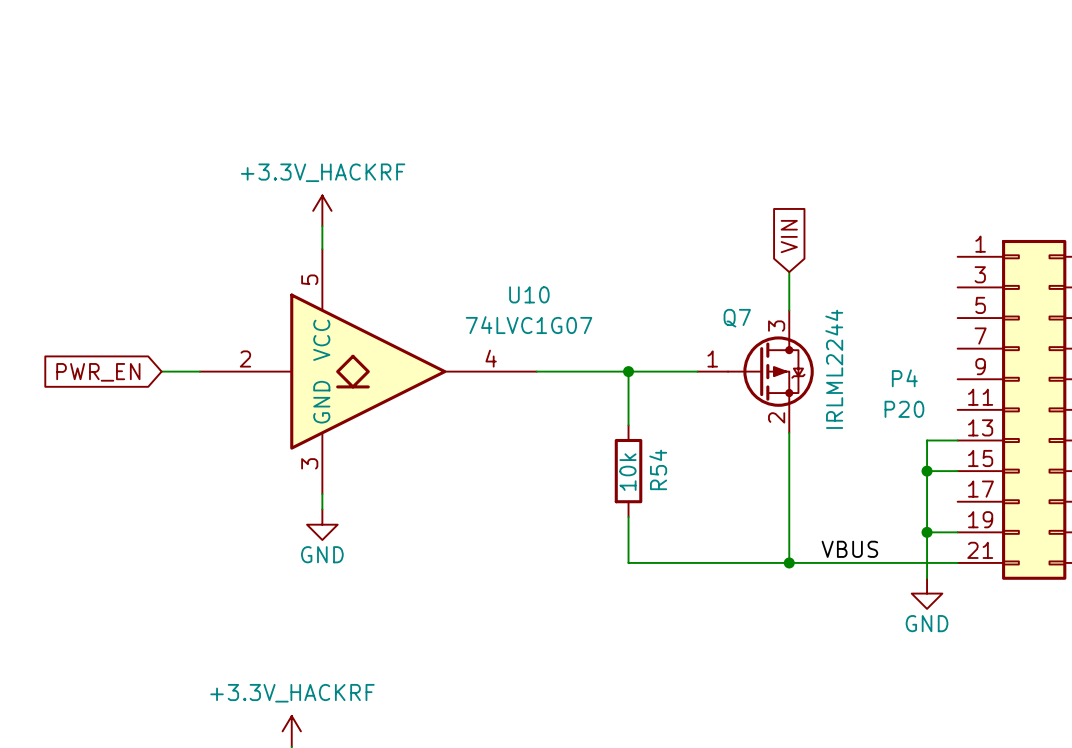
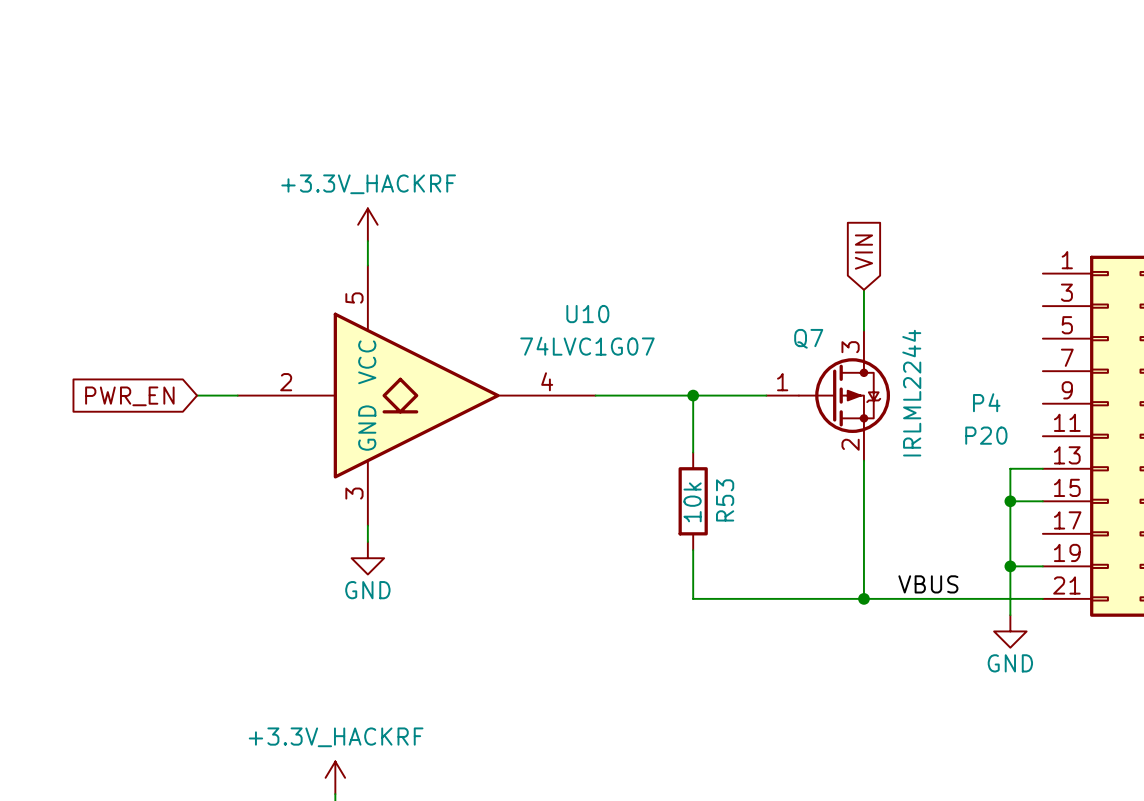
R54 name: R54 (658, 469) -> R53 (725, 500)

